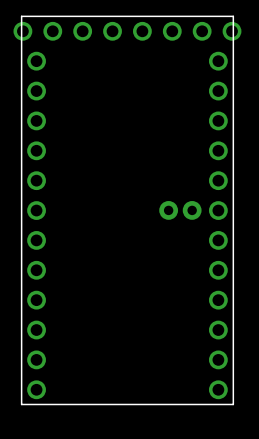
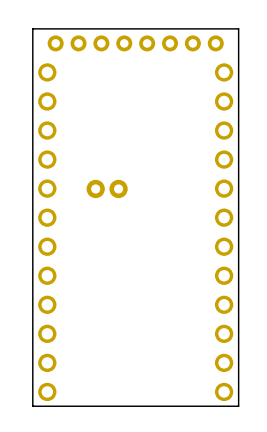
part footprint: [13, 21, 242, 41] -> [47, 35, 224, 52]
part position: (180, 210) -> (107, 188)

